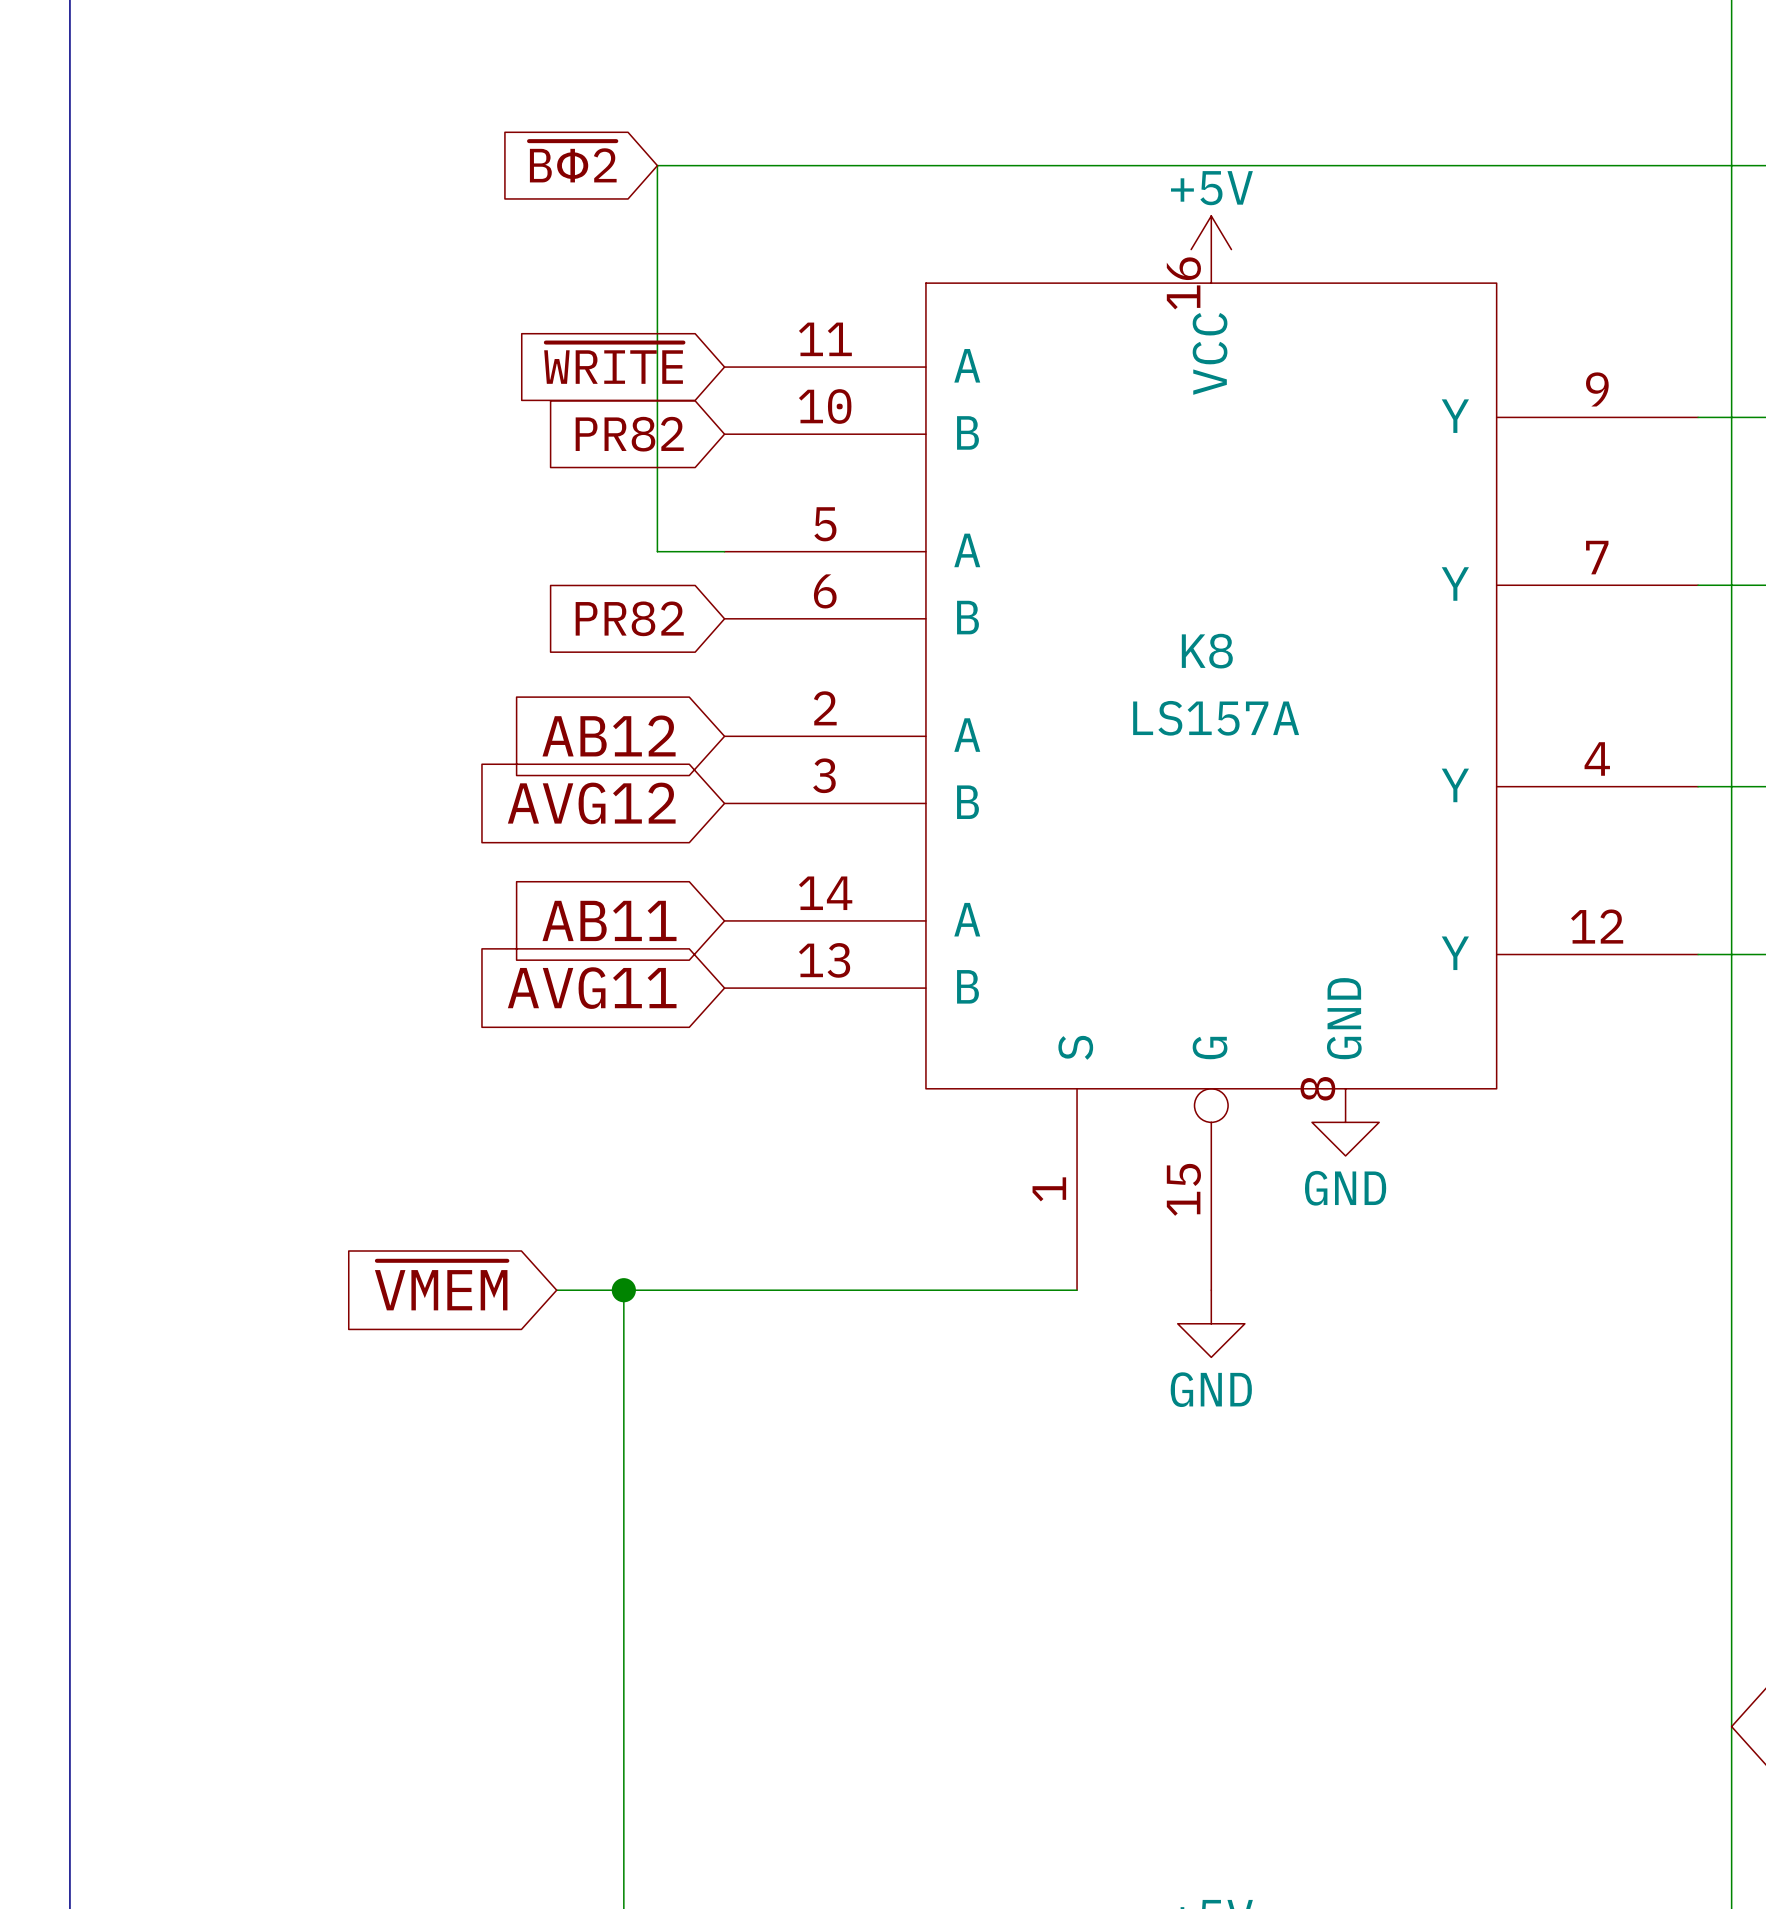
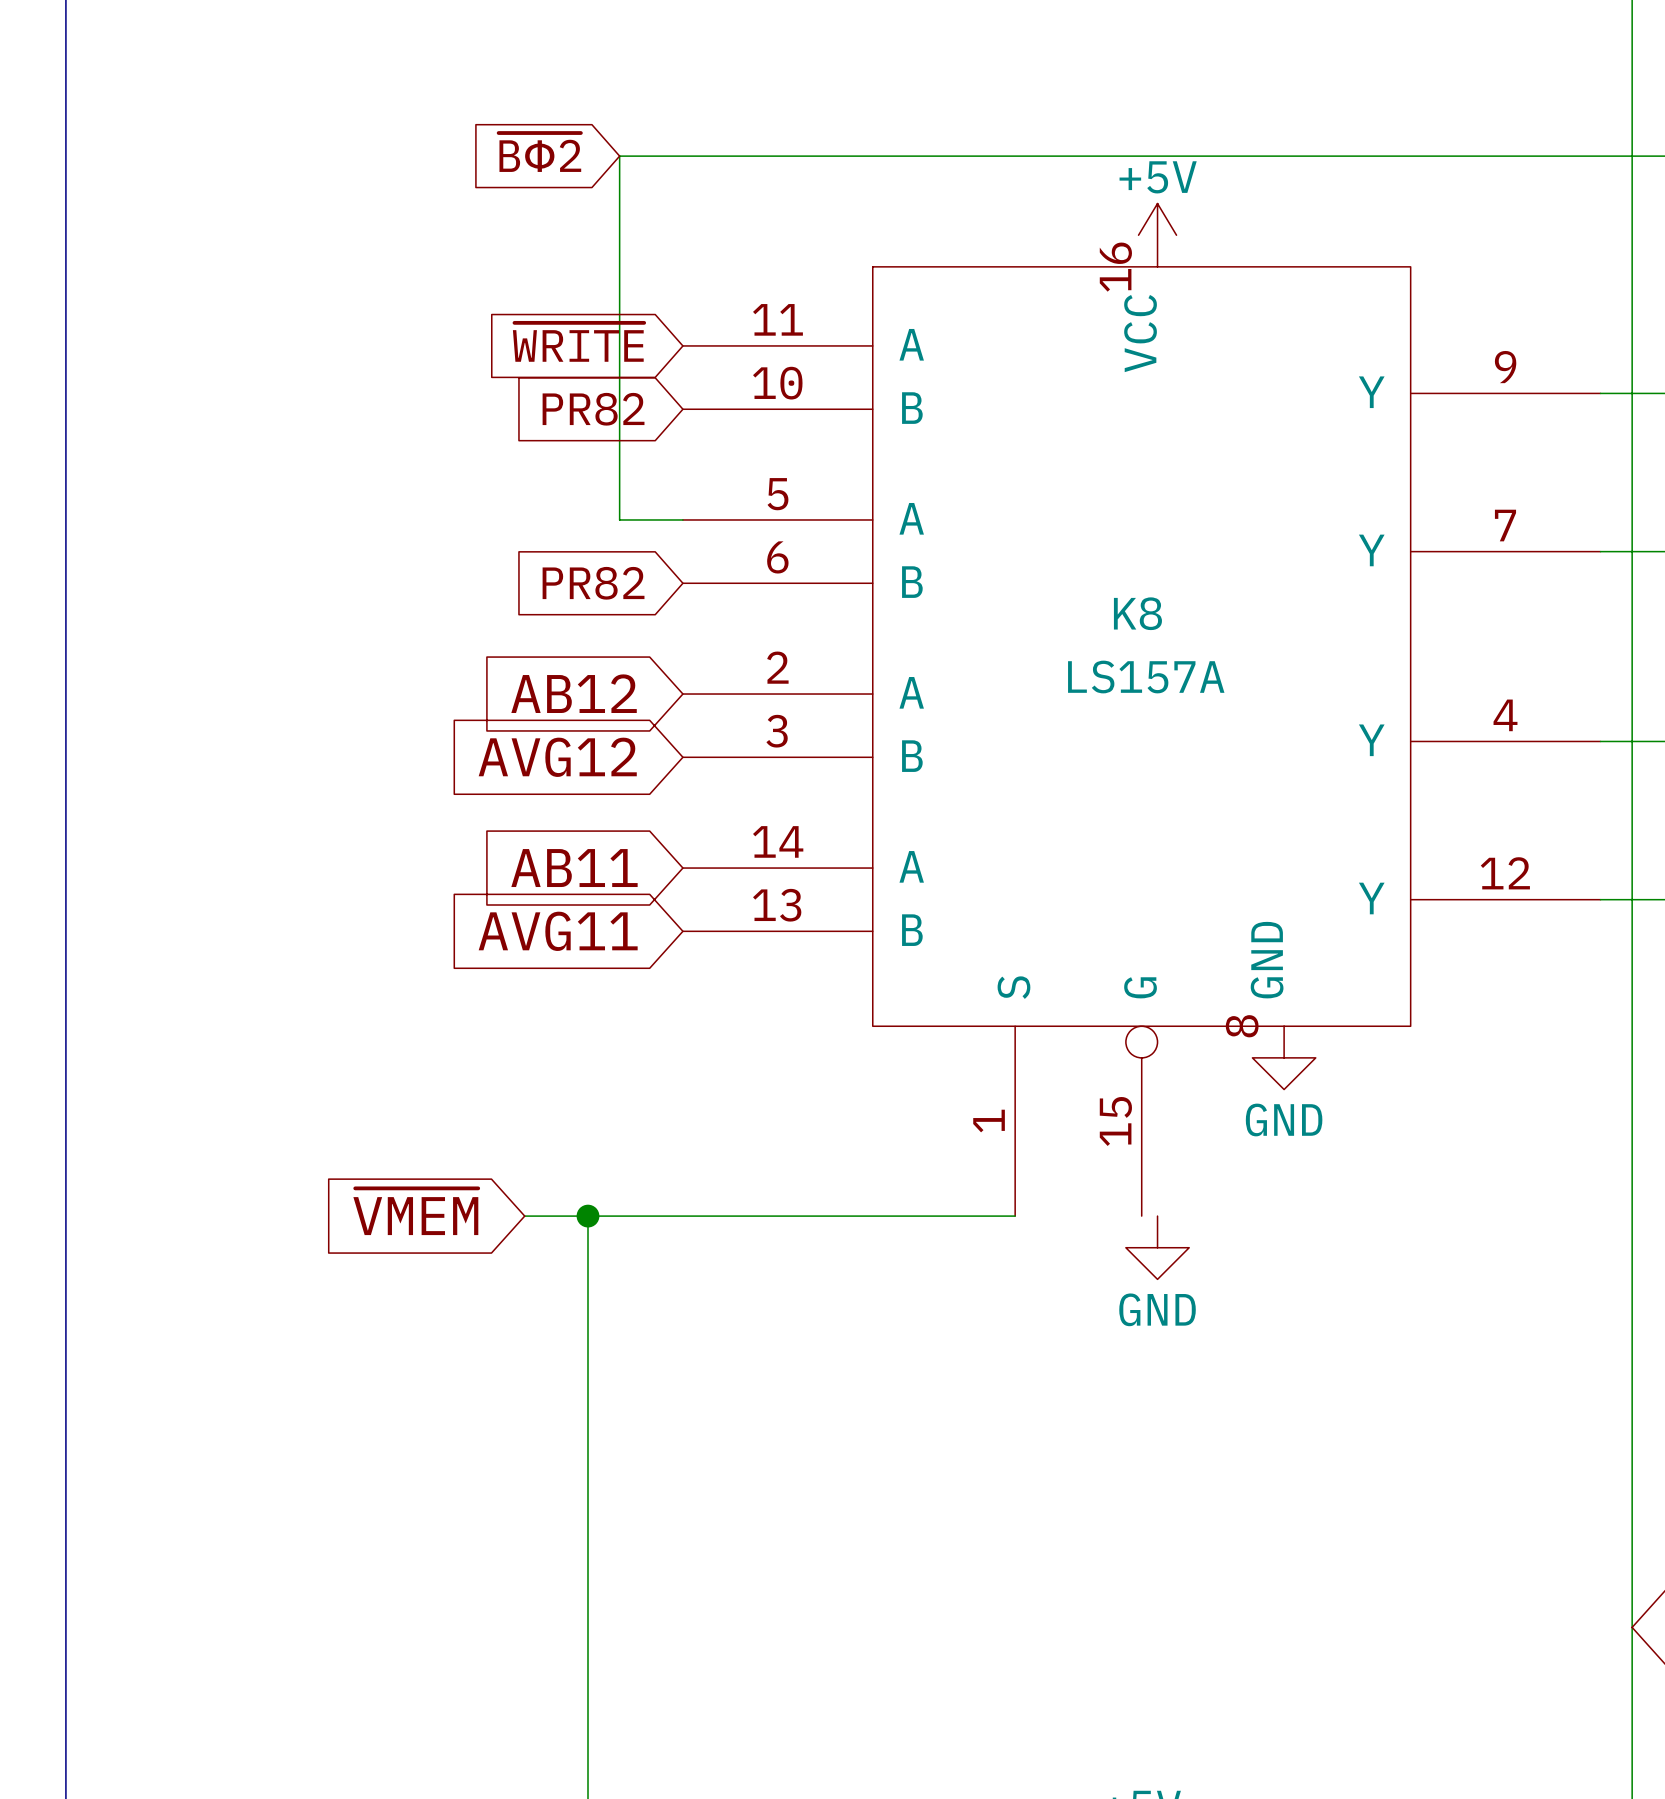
power symbol position: +5V (1211, 249) -> +5V (1157, 235)
power symbol position: GND (1345, 1122) -> GND (1284, 1057)
power symbol position: GND (1211, 1323) -> GND (1157, 1247)

